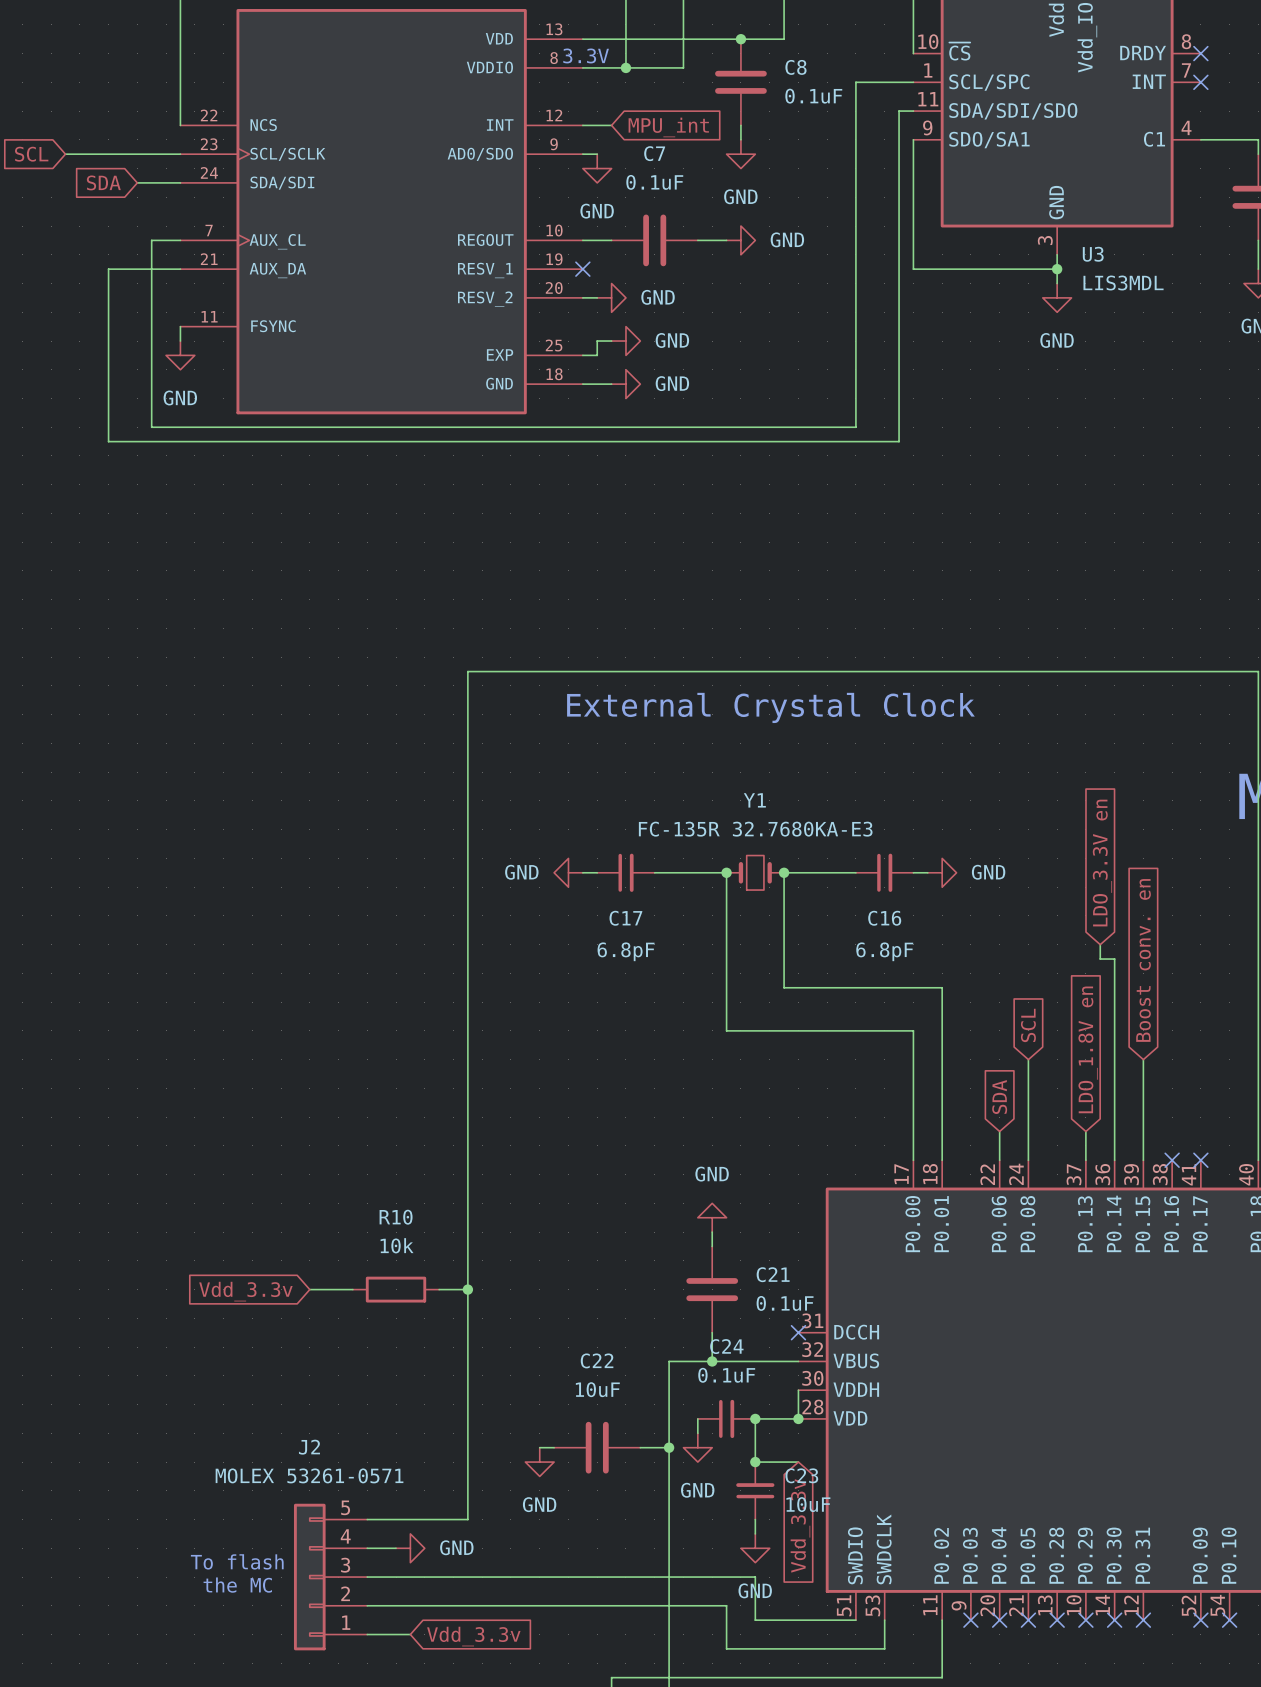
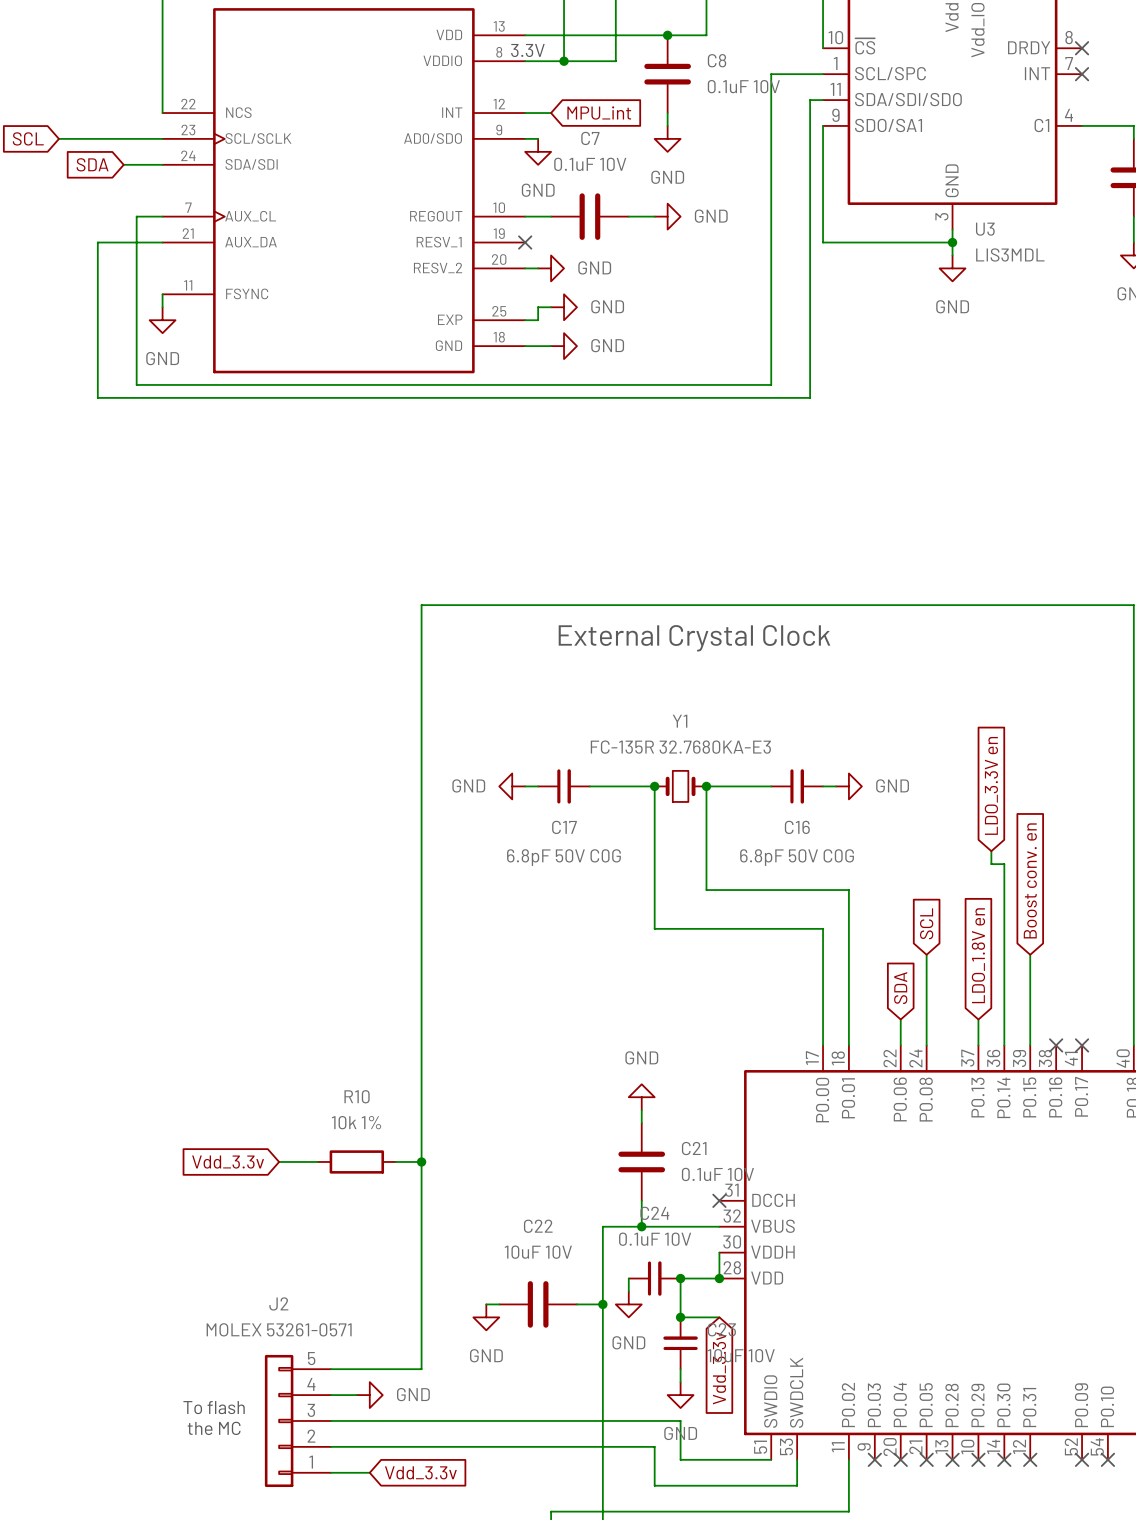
C8 value: 0.1uF (813, 96) -> 0.1uF 10V (743, 86)
C7 value: 0.1uF (654, 182) -> 0.1uF 10V (590, 164)
C17 value: 6.8pF (626, 951) -> 6.8pF 50V C0G (563, 857)
C16 value: 6.8pF (884, 951) -> 6.8pF 50V C0G (797, 857)
R10 value: 10k (397, 1245) -> 10k 1% (356, 1122)
C21 value: 0.1uF (785, 1303) -> 0.1uF 10V (717, 1174)
C24 value: 0.1uF (726, 1375) -> 0.1uF 10V (655, 1239)
C22 value: 10uF (597, 1389) -> 10uF 10V (538, 1252)
C23 value: 10uF (808, 1504) -> 10uF 10V (741, 1355)

